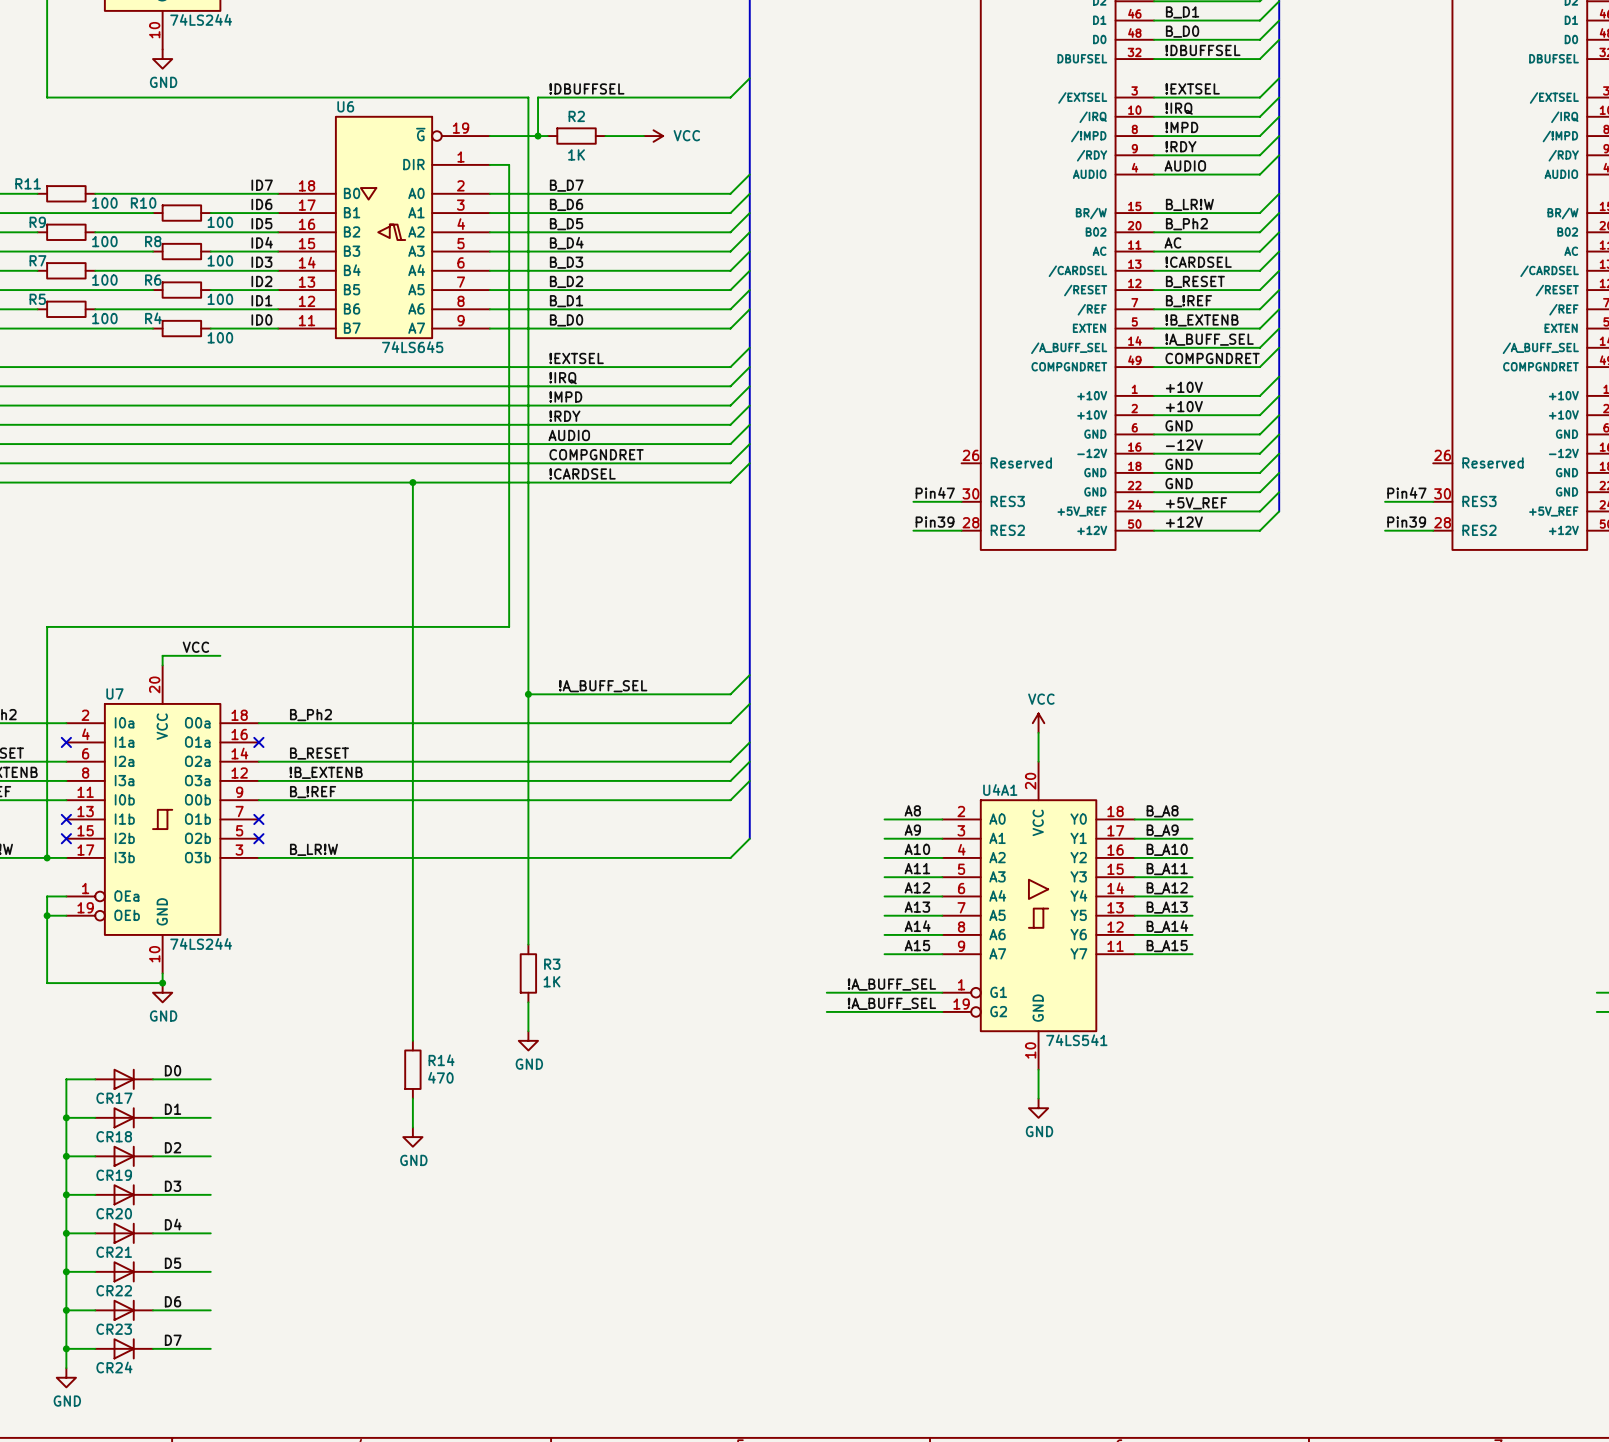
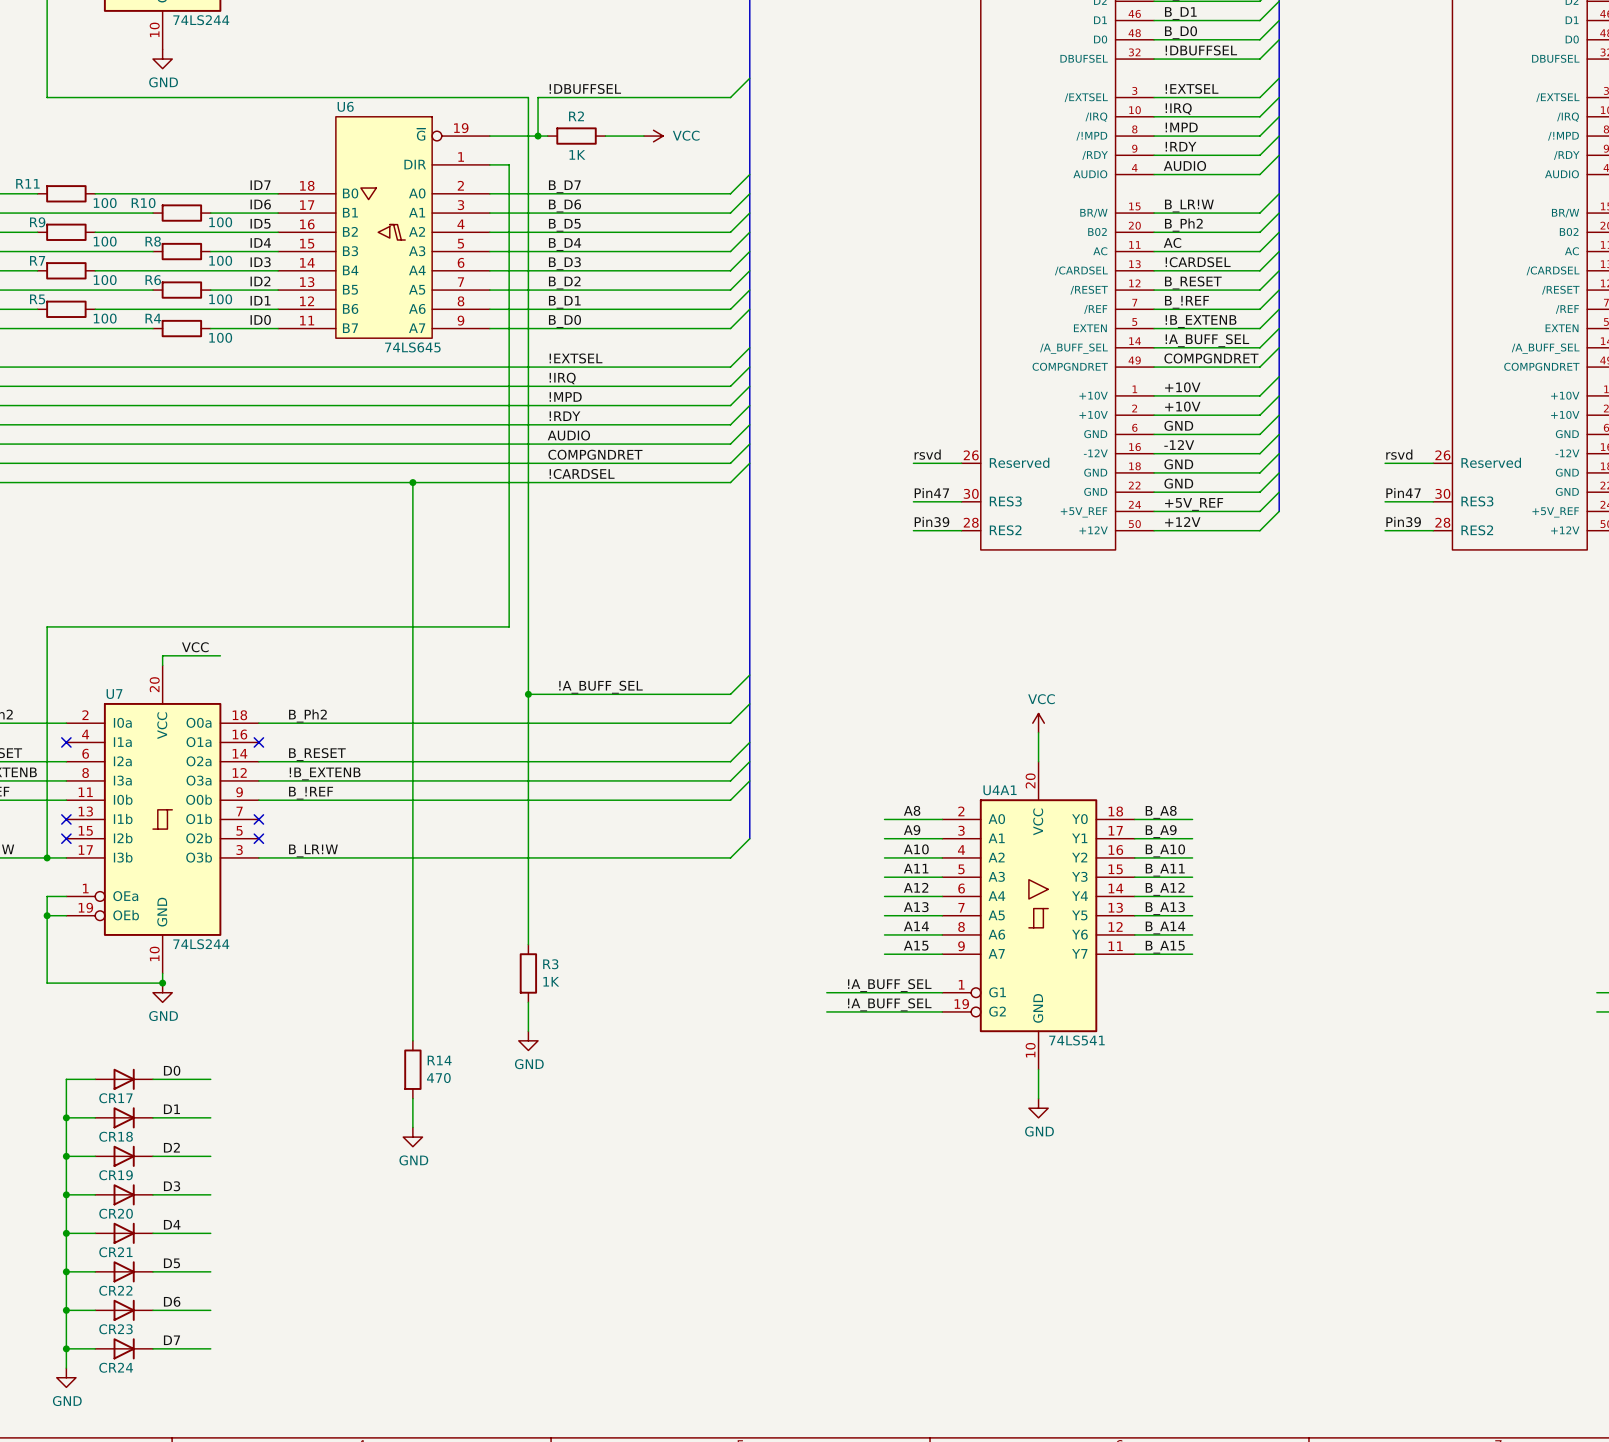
label: none -> rsvd (927, 454)
label: none -> rsvd (1399, 454)
wire: none -> (913, 463) (961, 463)
wire: none -> (1385, 463) (1433, 463)

